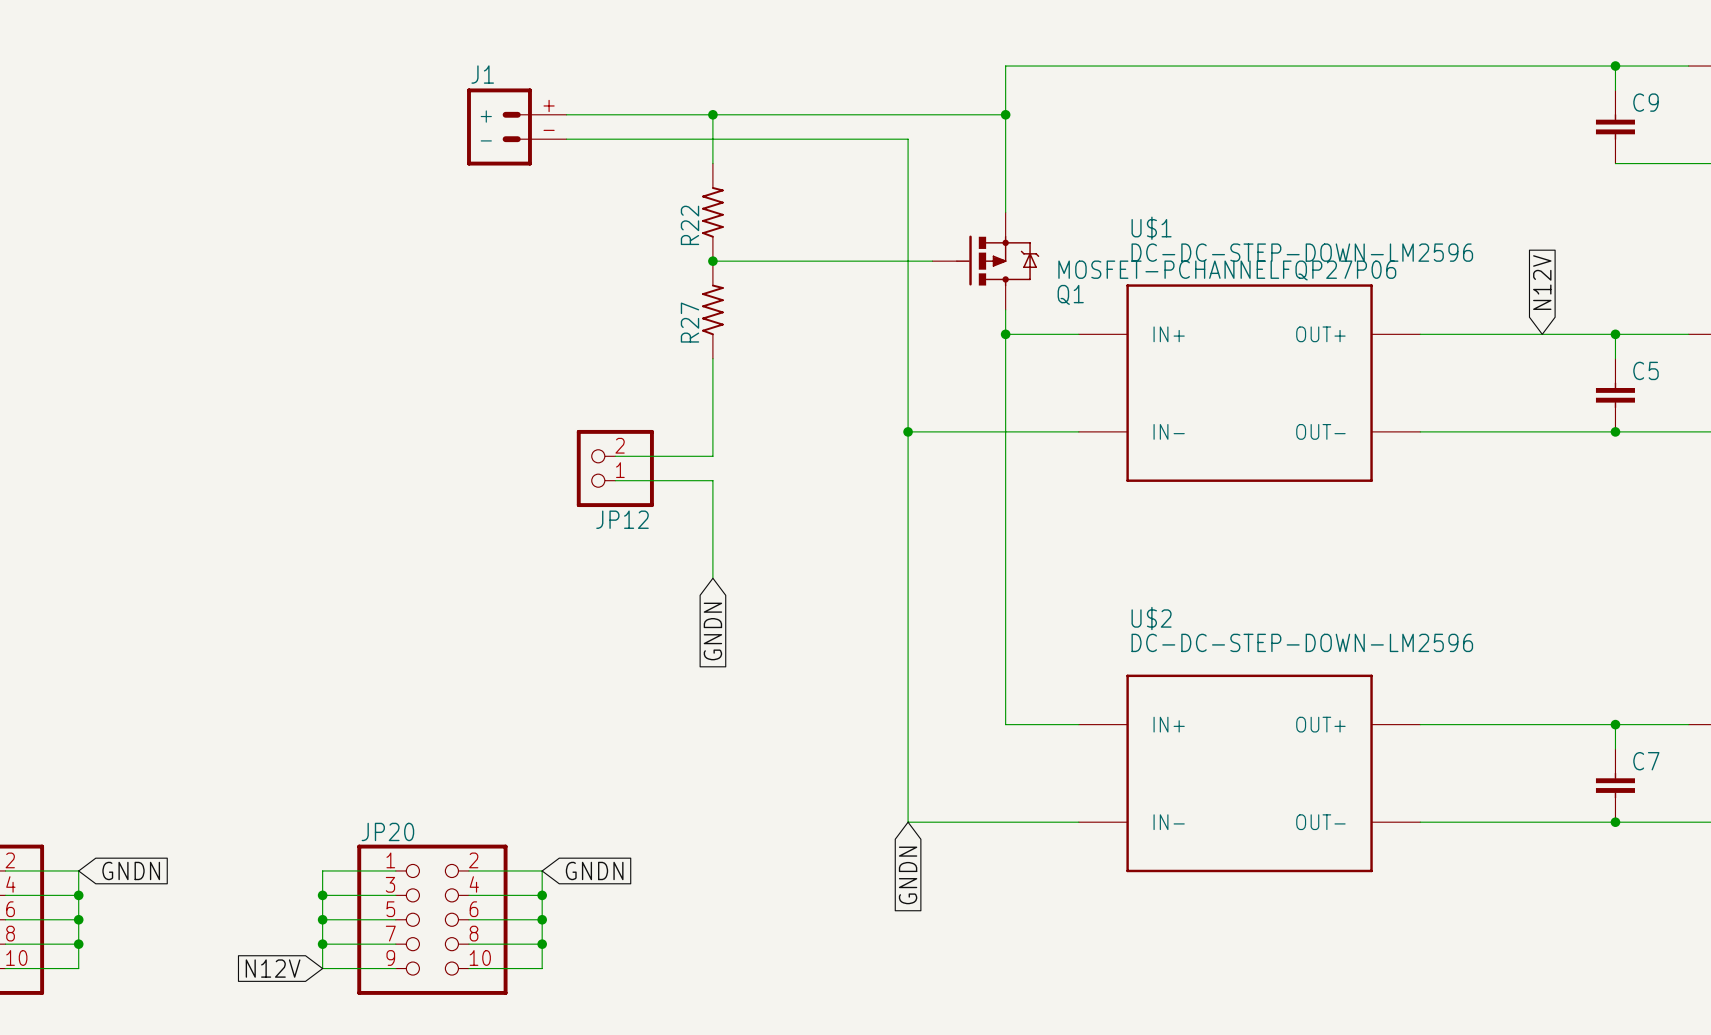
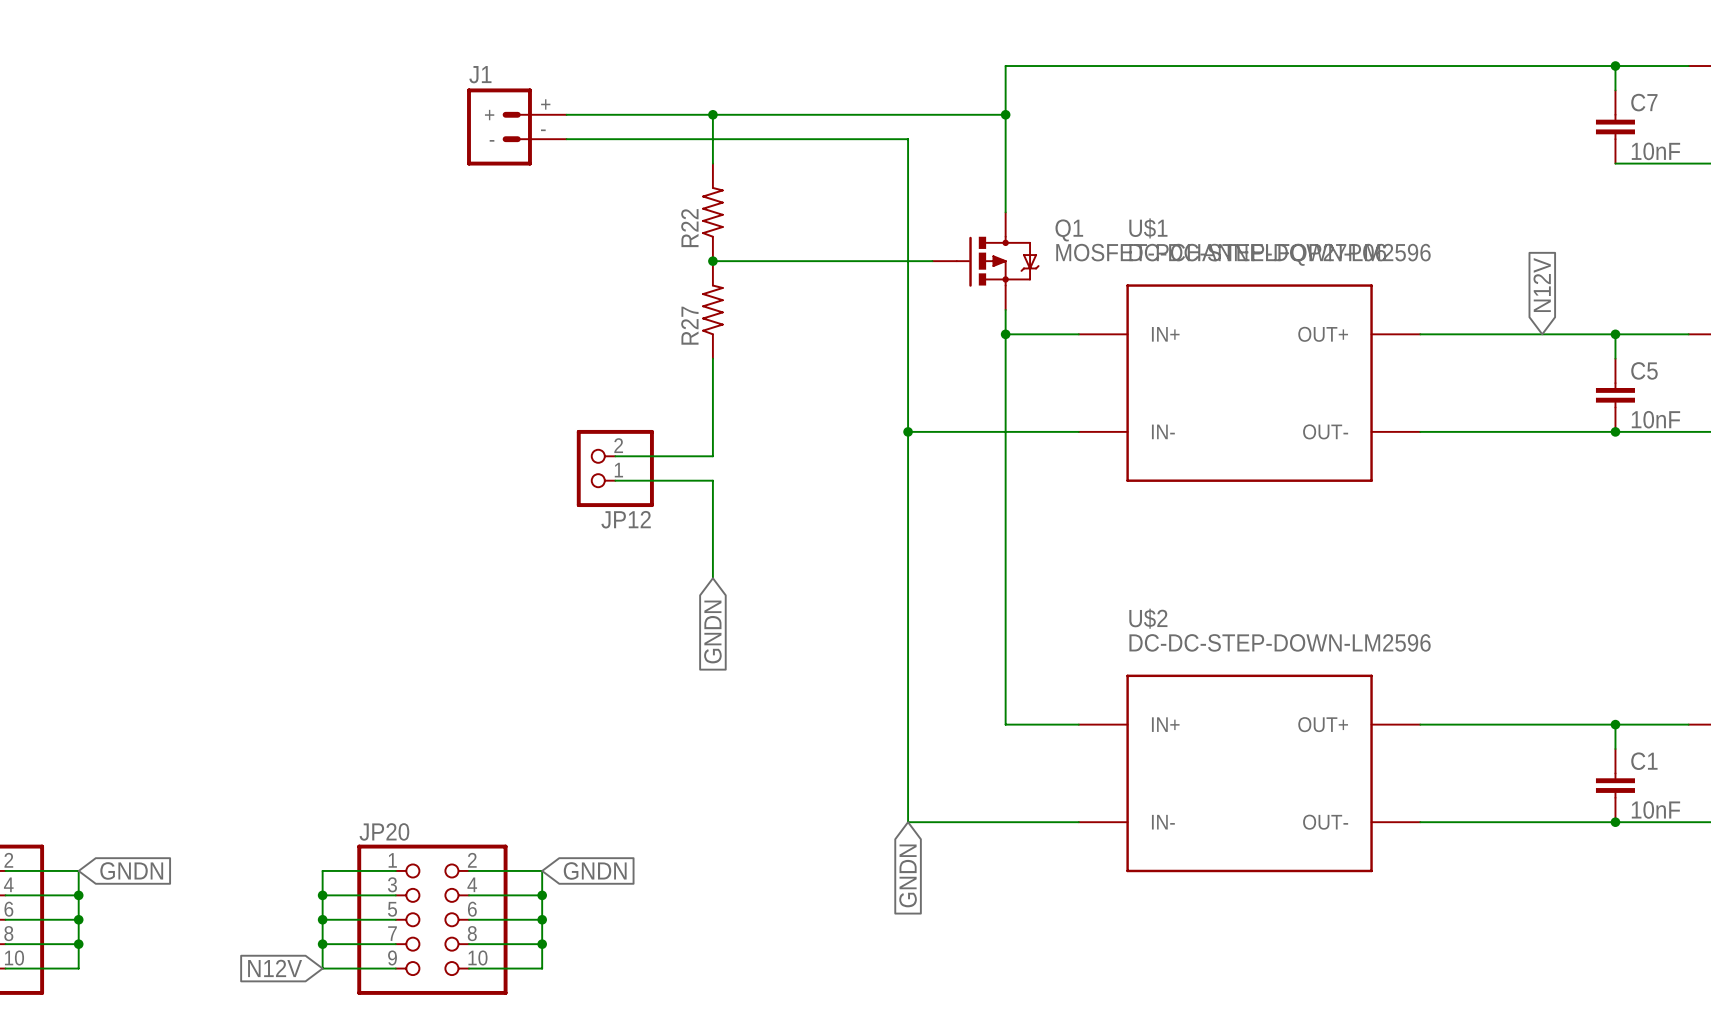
C9 name: C9 (1646, 102) -> C7 (1644, 102)
C9 value: none -> 10nF (1655, 151)
Q1 flip: as is (997, 260) -> up-down (997, 261)
C5 value: none -> 10nF (1655, 419)
C7 name: C7 (1646, 761) -> C1 (1644, 761)
C7 value: none -> 10nF (1655, 809)

